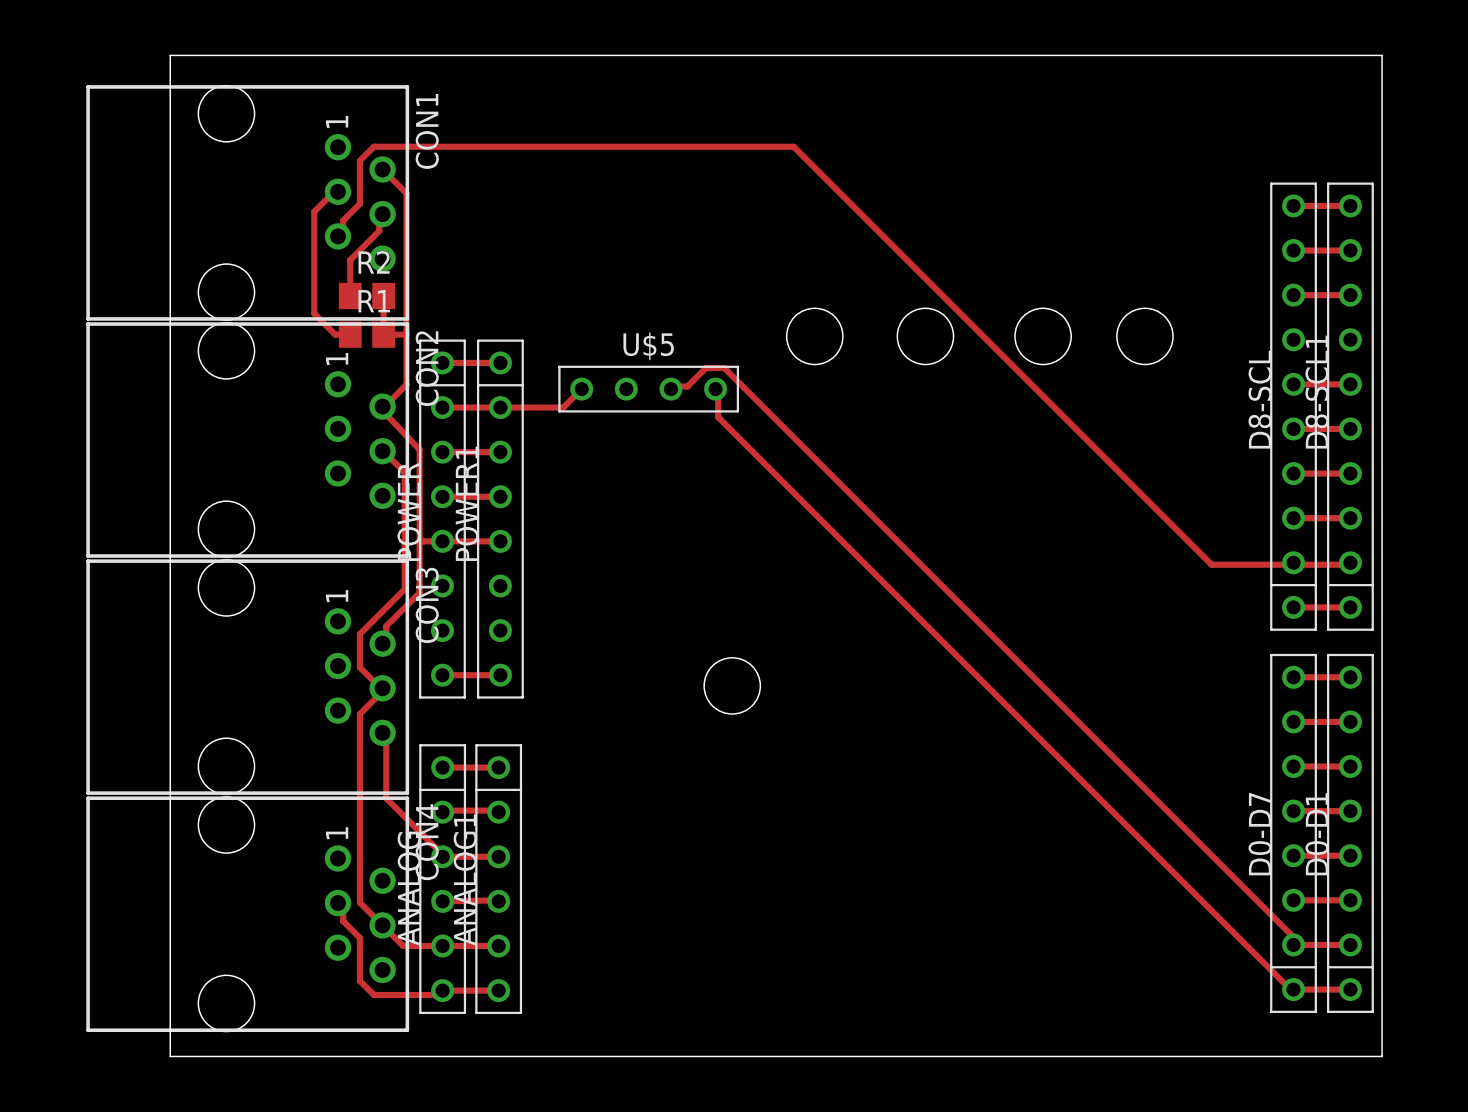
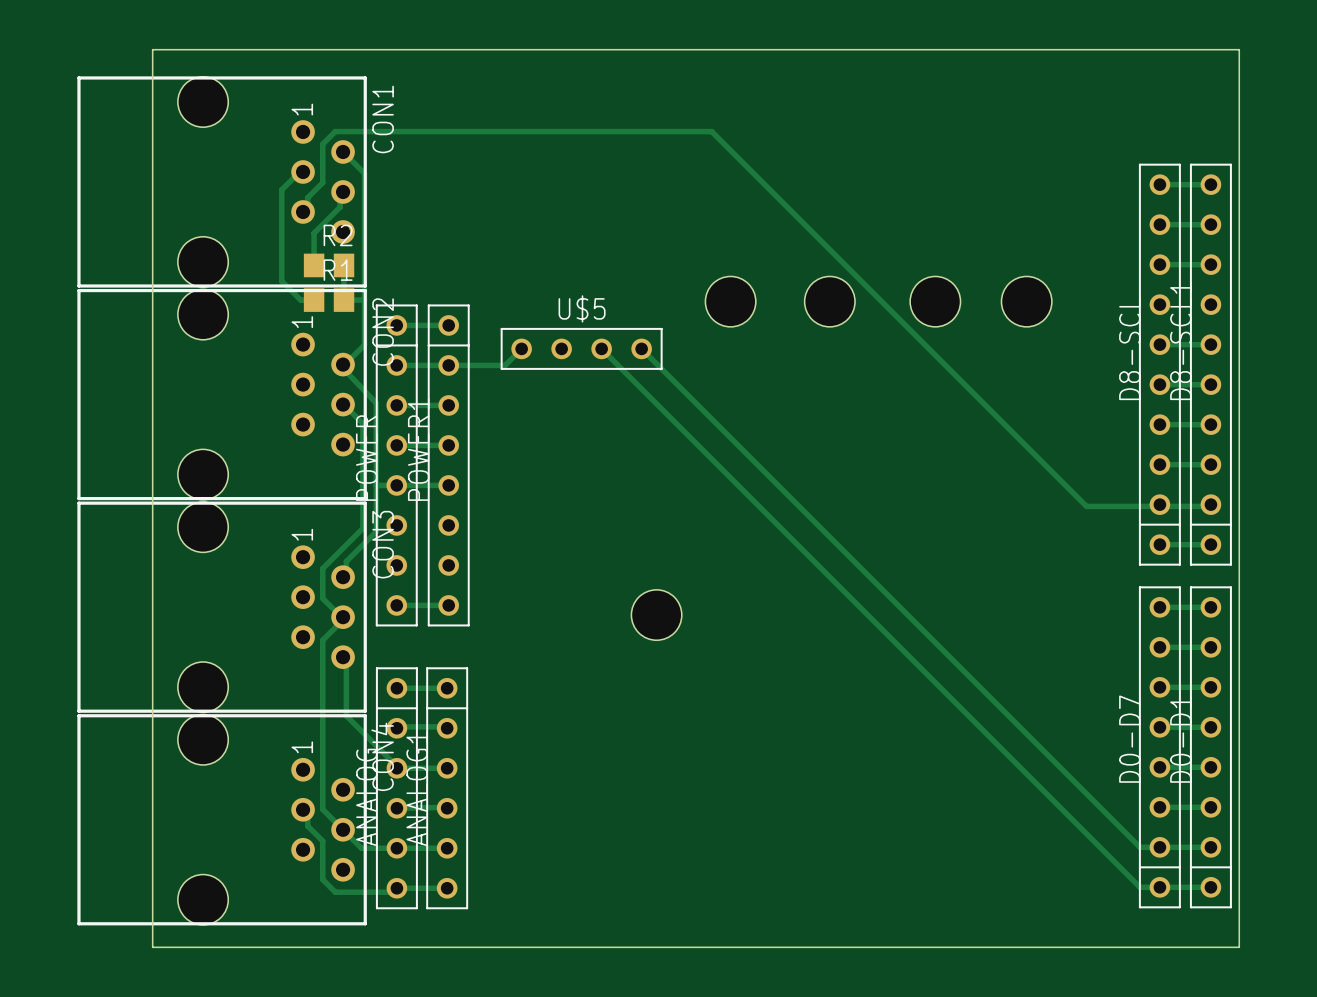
track: (670, 389) (675, 386) (687, 386) (705, 368) (724, 368) (1295, 939) (1293, 944) (1296, 944) -> none
track: (715, 389) (718, 392) (718, 417) (1289, 988) (1293, 989) -> (601, 348) (1140, 887) (1159, 887)
track: none -> (641, 348) (1140, 847) (1159, 847)

